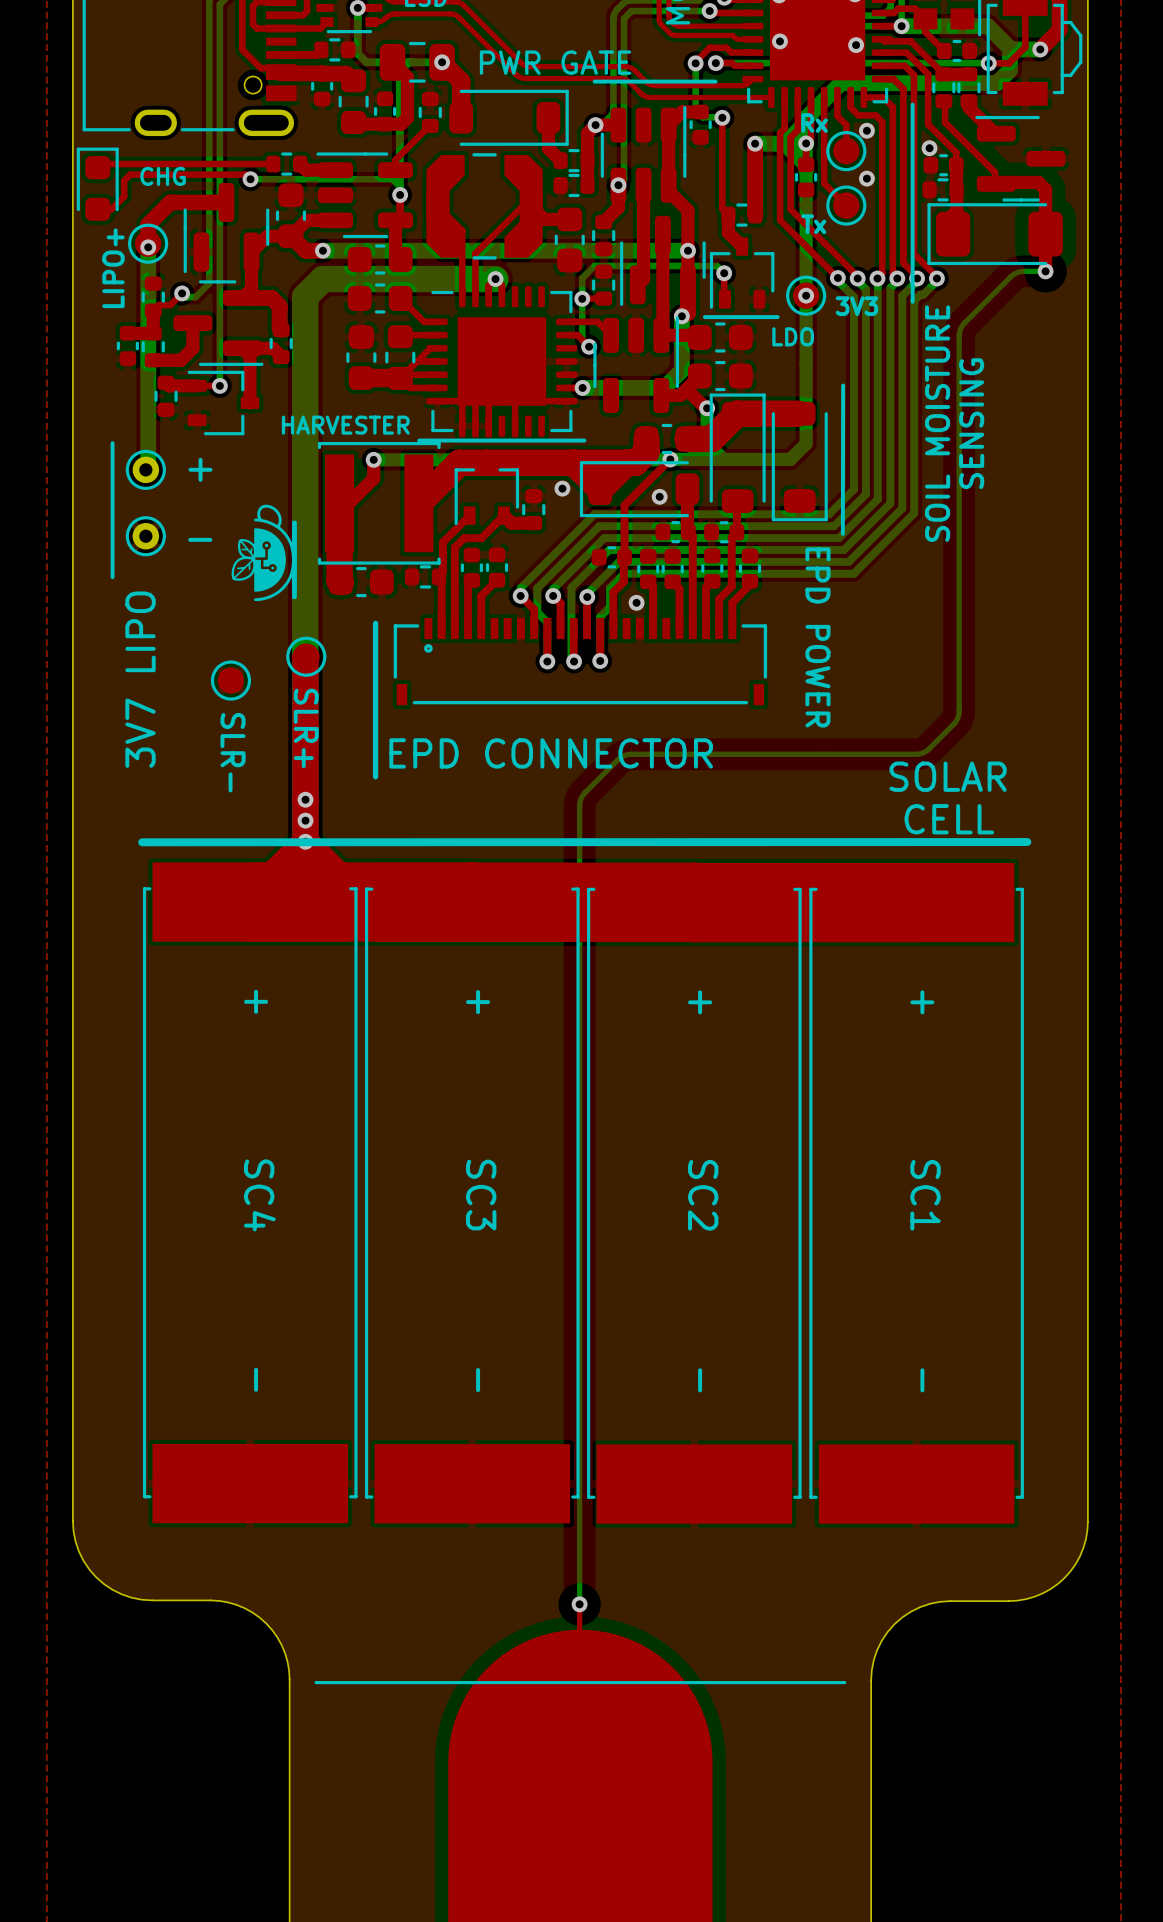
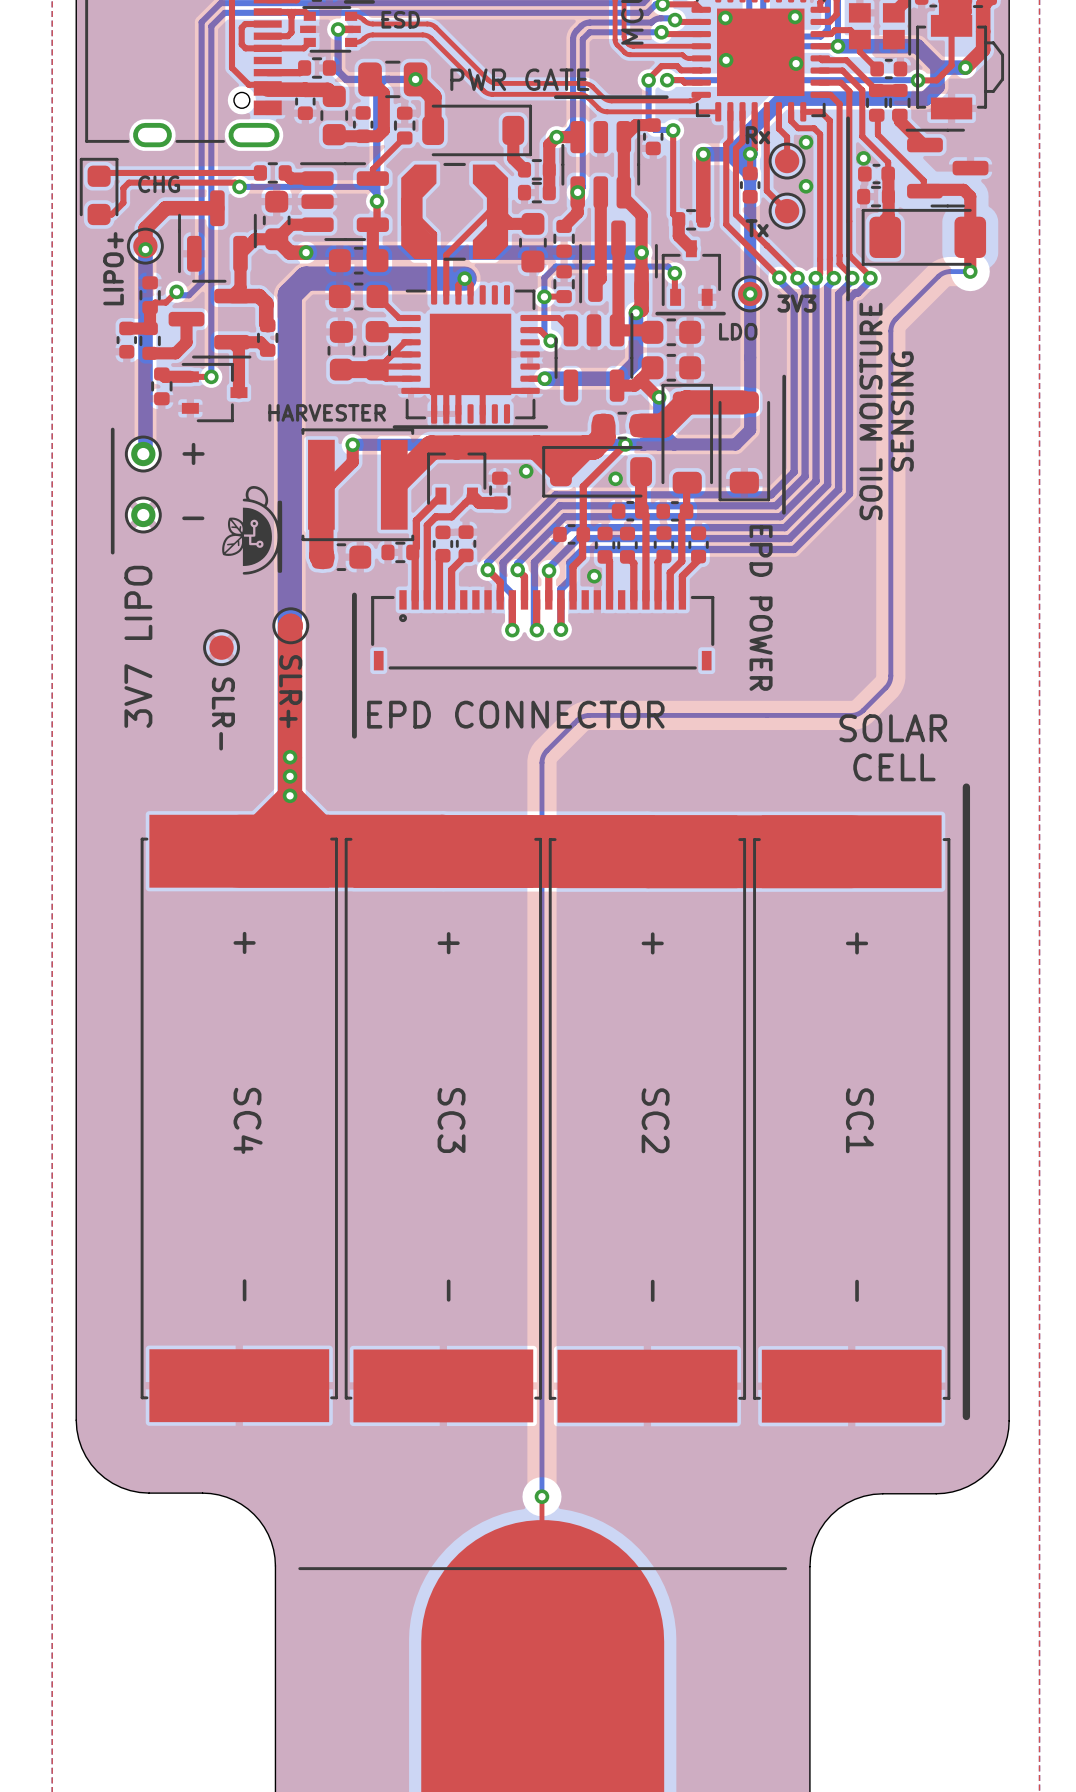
text position: SOLAR (948, 776) -> SOLAR (893, 728)
text position: CELL (949, 819) -> CELL (894, 767)
line: none -> (966, 787) (966, 1416)
line: (1027, 842) (142, 842) -> none

